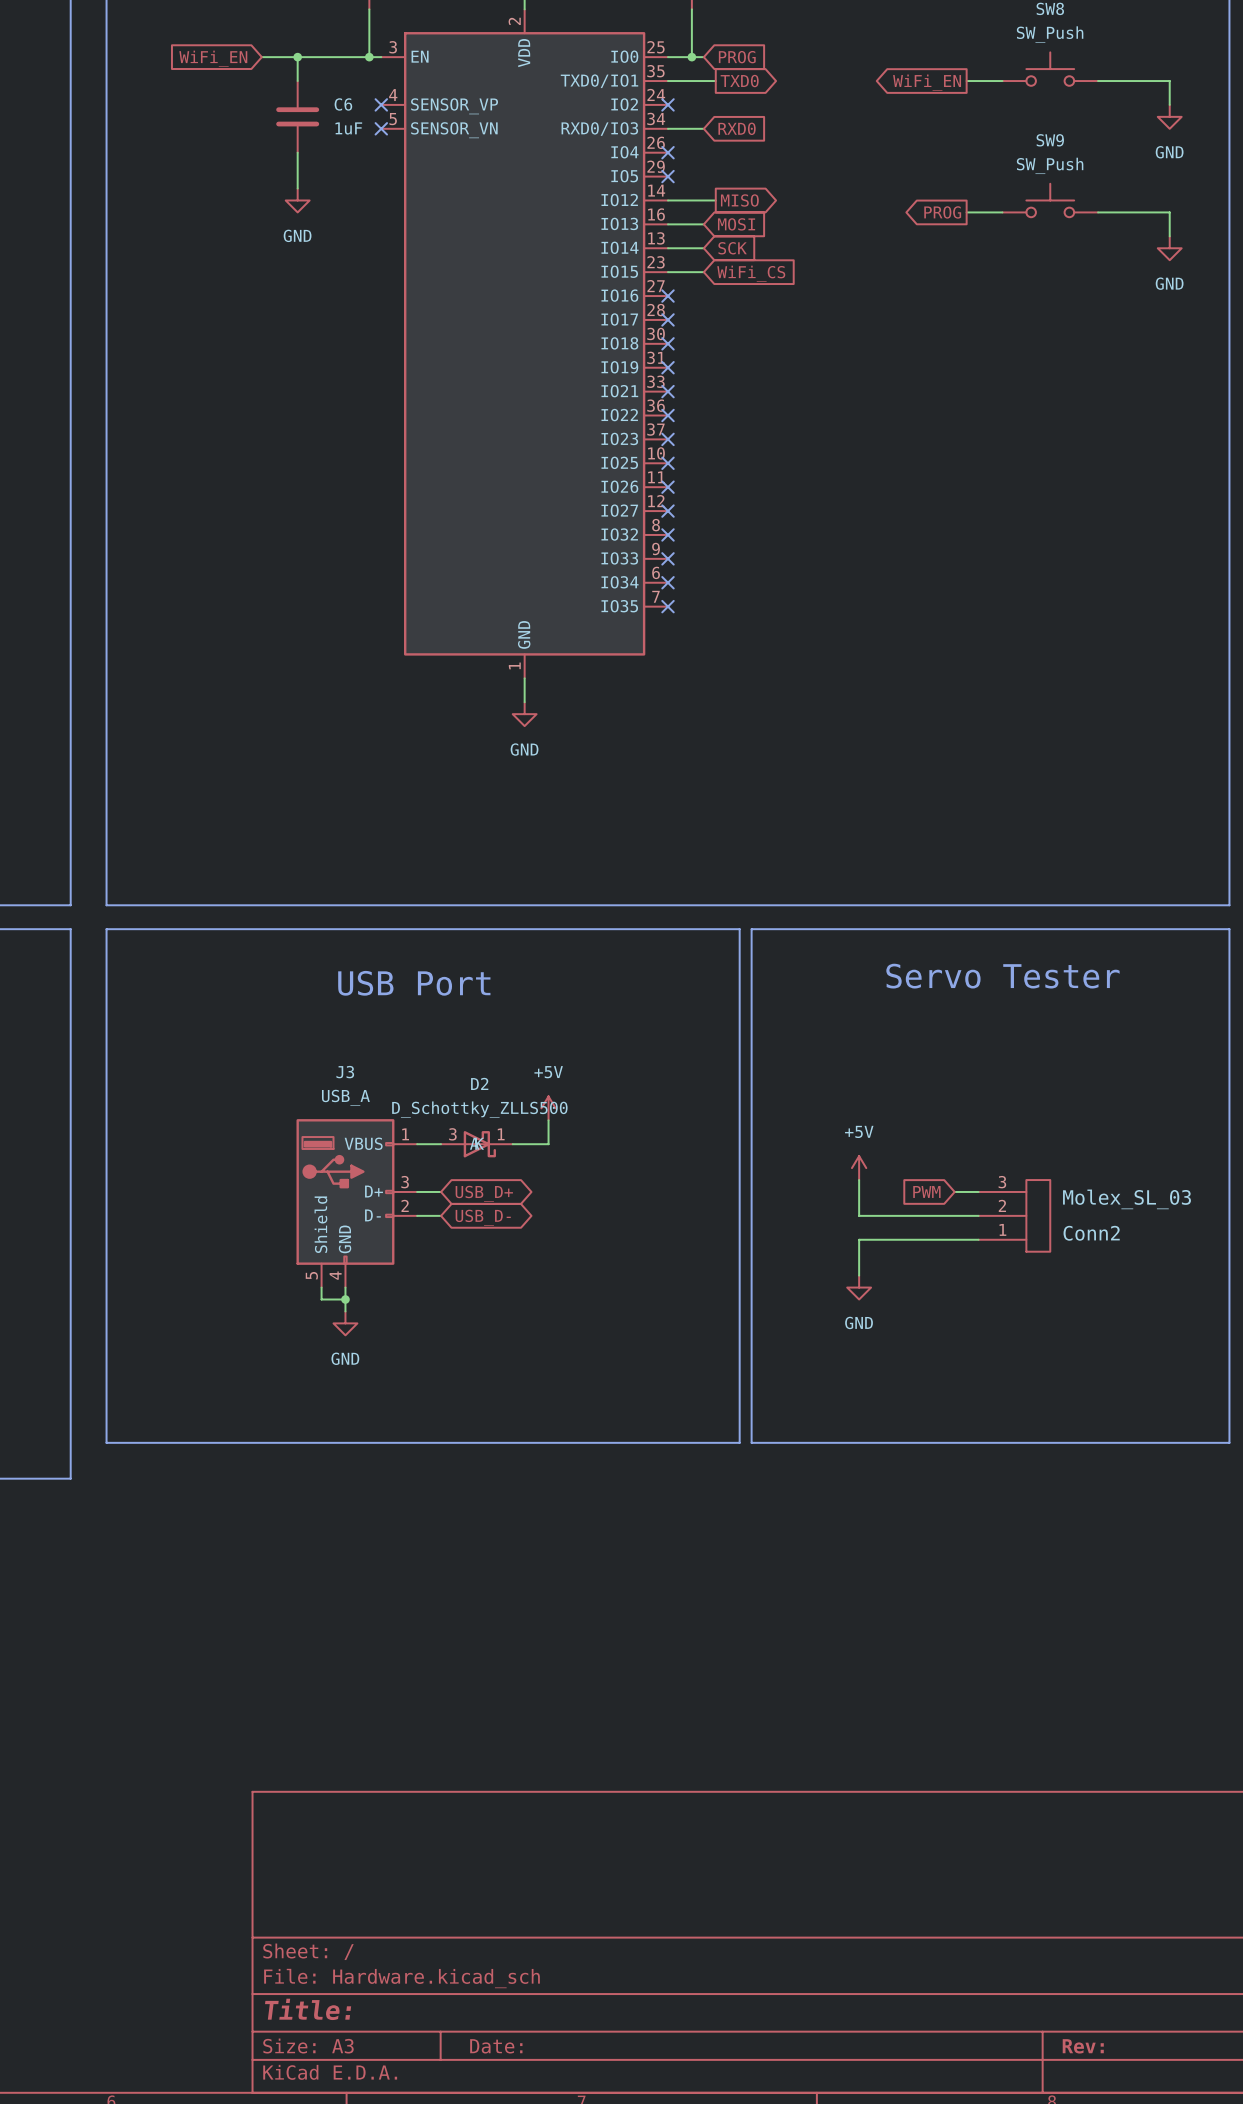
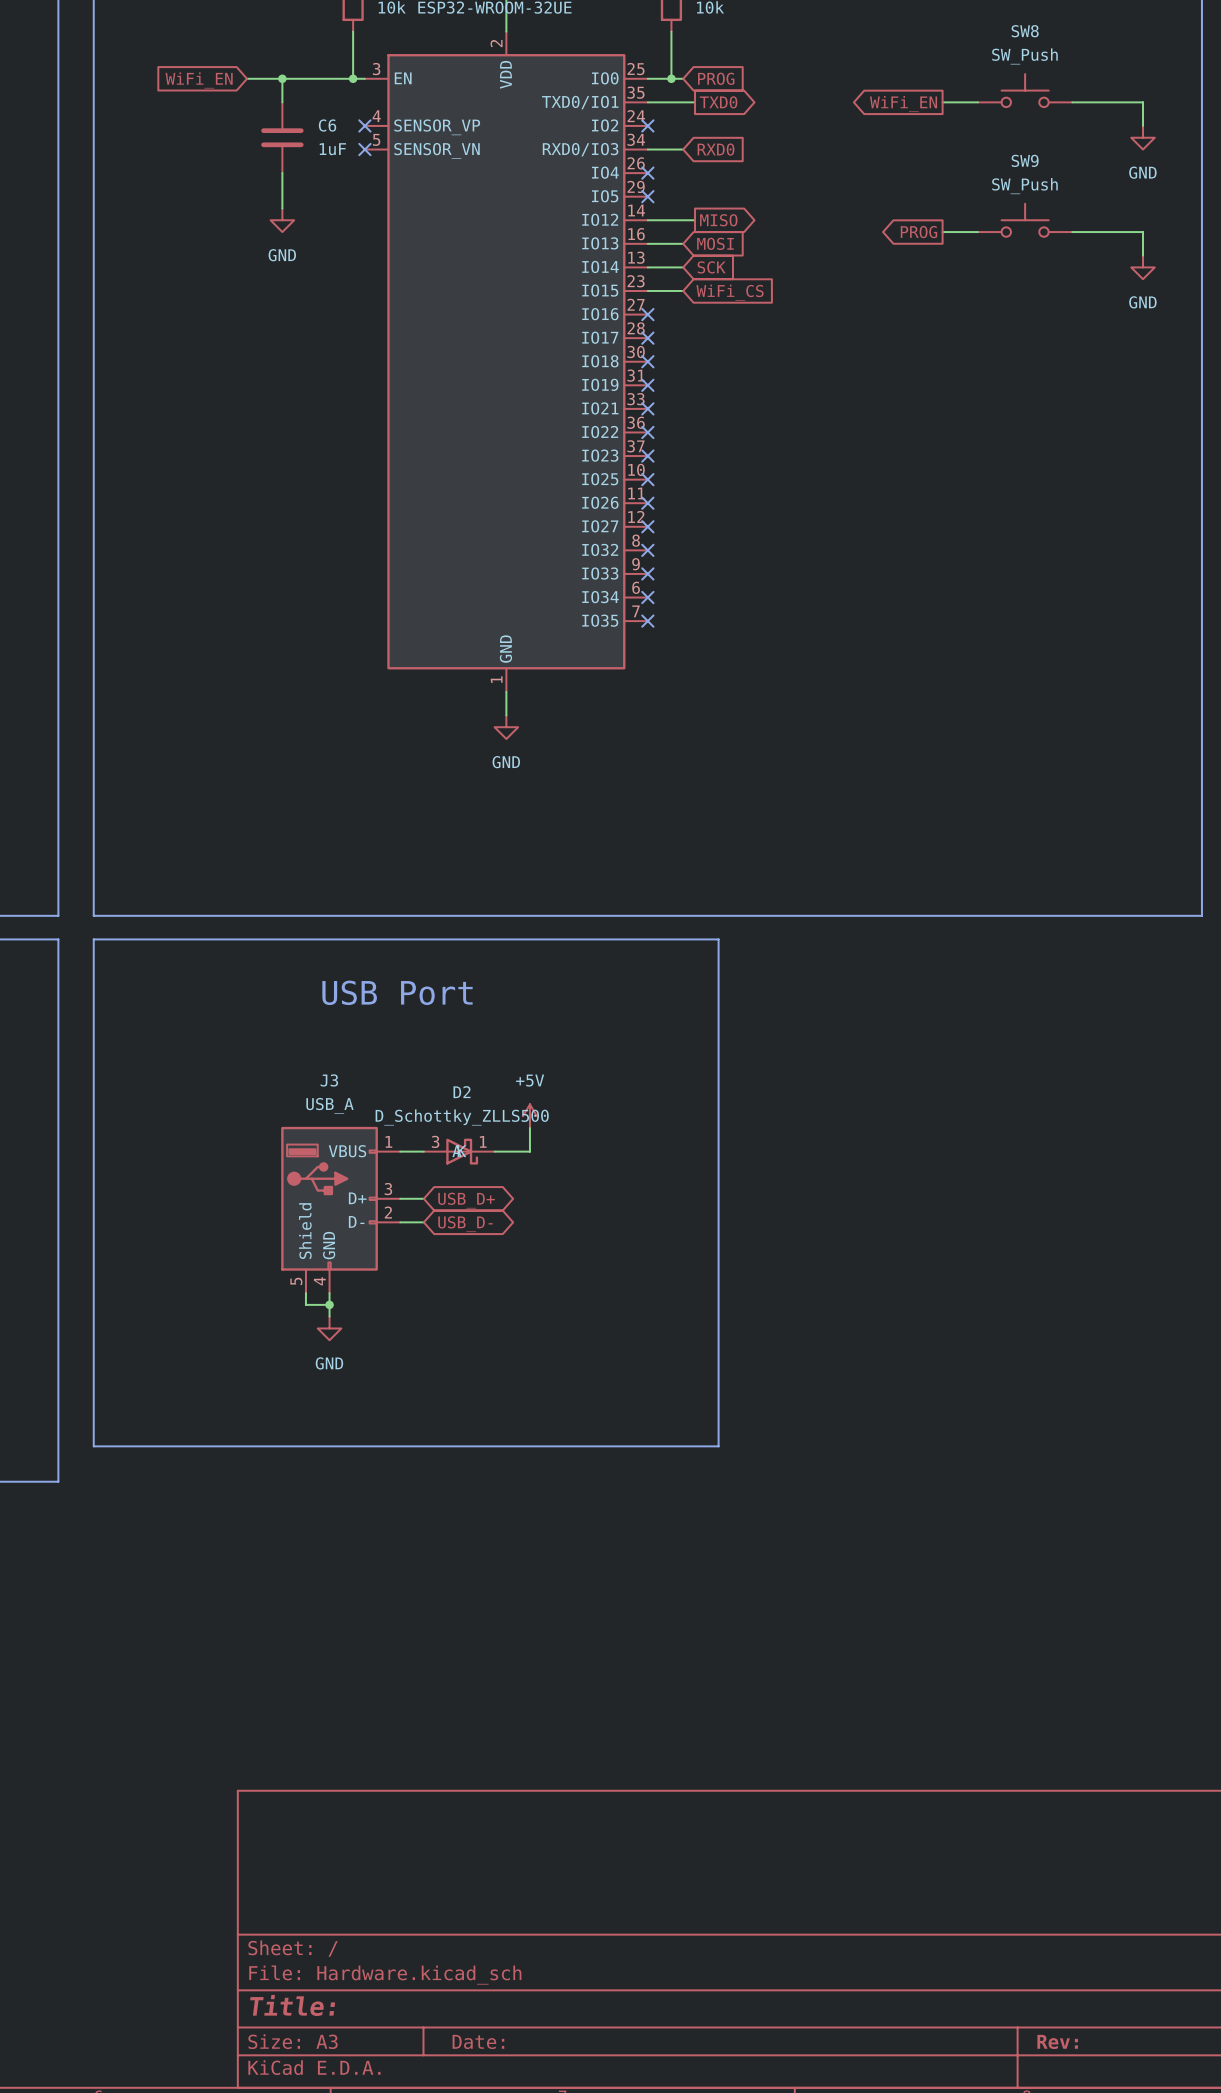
line: (751, 929) (1229, 929) (1229, 1442) (751, 1442) (751, 929) -> none
text: Servo Tester (1002, 976) -> none
power symbol: +5V (859, 1168) -> none
wire: (859, 1180) (859, 1215) (978, 1215) -> none
global label: PWM (926, 1191) -> none
wire: (954, 1191) (978, 1191) -> none
Conn2: Molex_SL_03 (1014, 1215) -> none
wire: (978, 1239) (859, 1239) (859, 1275) -> none
power symbol: GND (859, 1287) -> none

